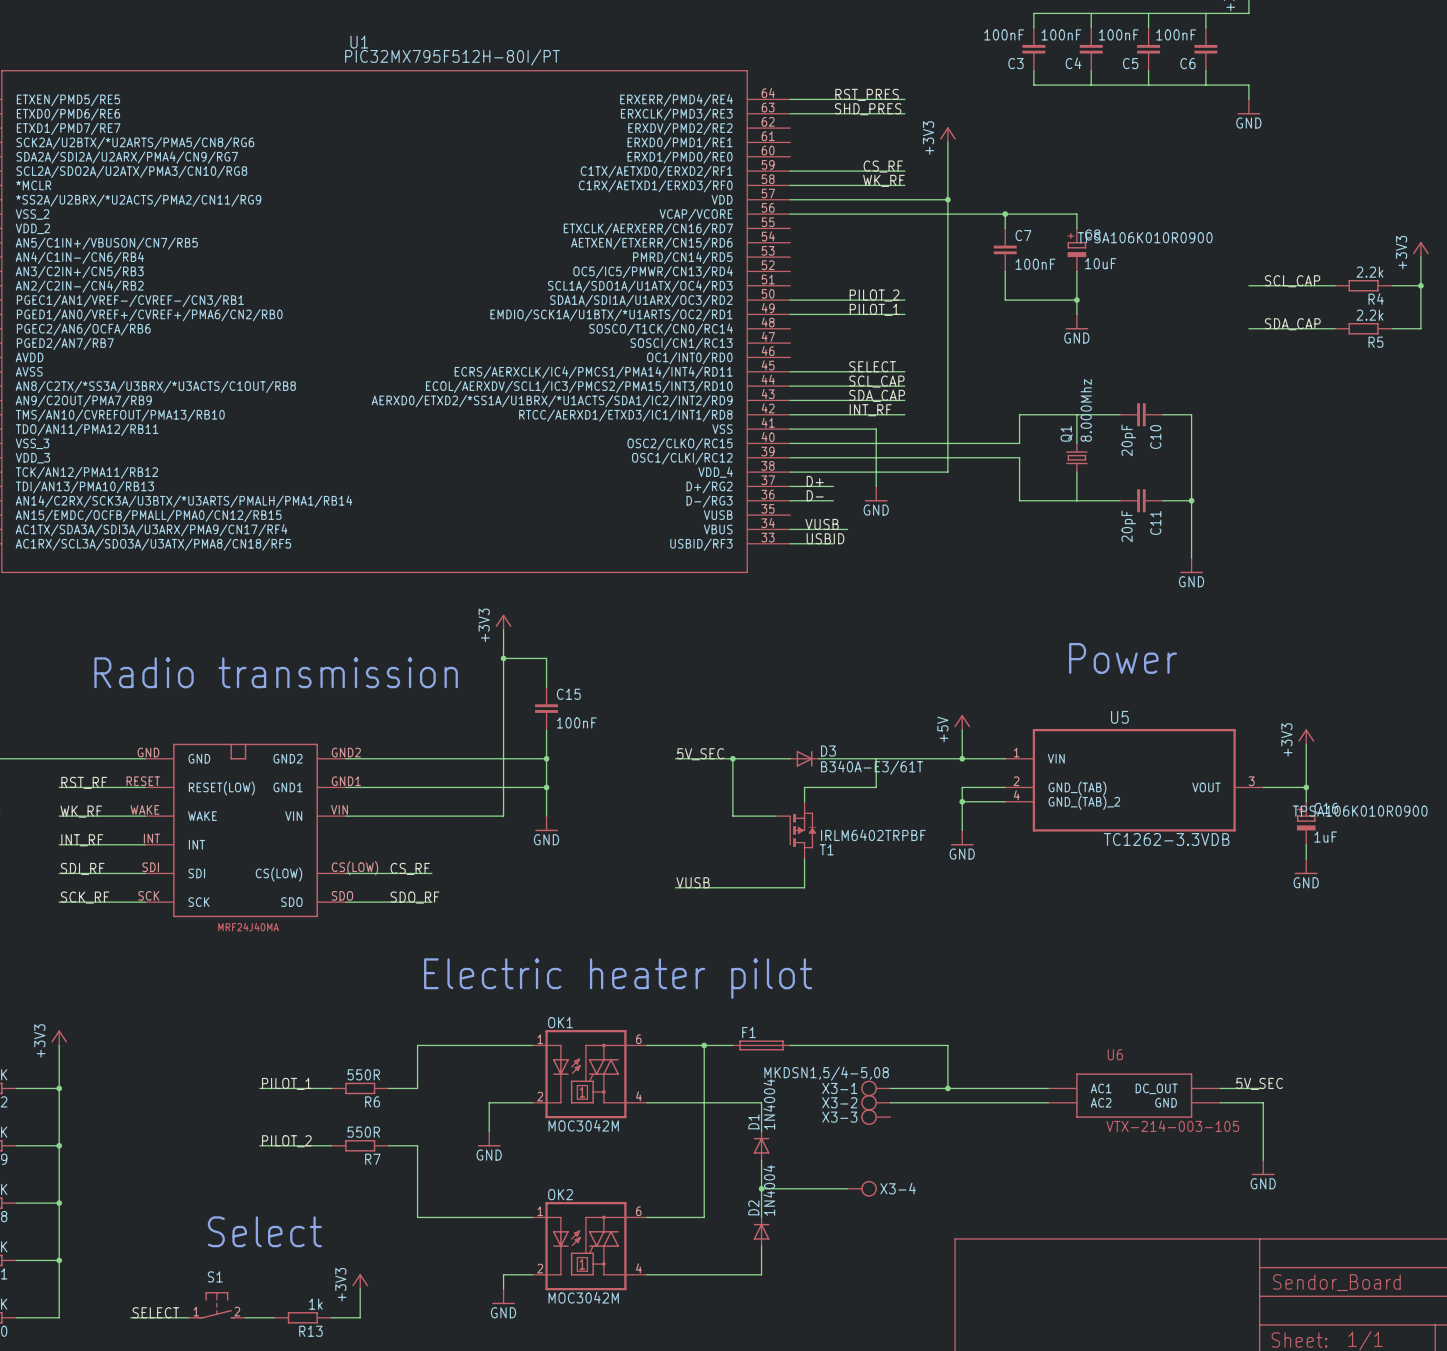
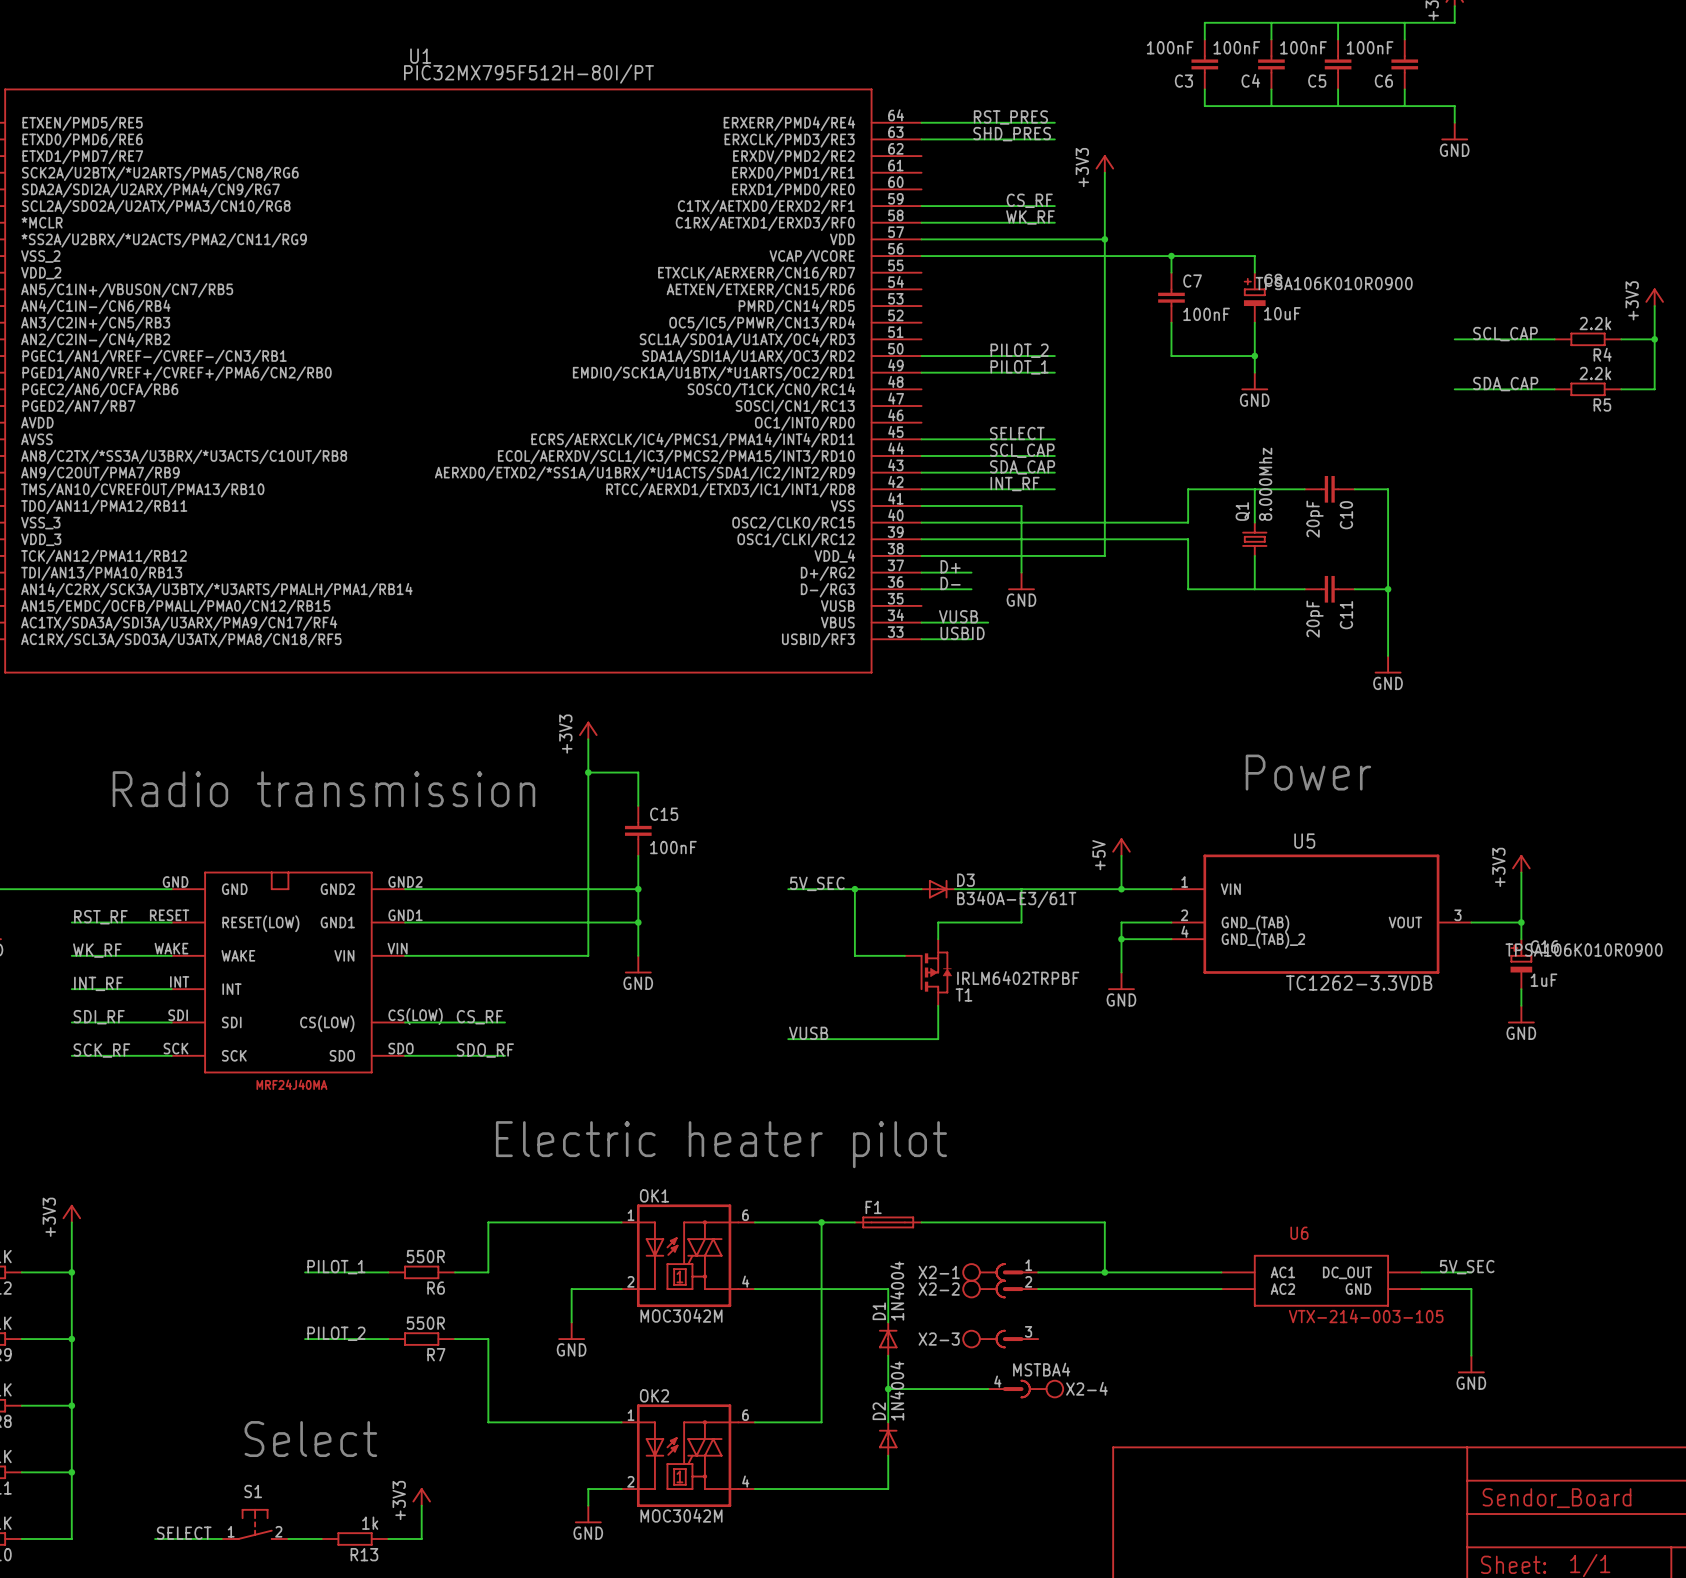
X2-1: none -> (1000, 1272)
X3-1: MKDSN1,5/4-5,08 (875, 1088) -> none
X2-2: none -> (1000, 1289)
X3-2: (875, 1102) -> none
X3-3: (875, 1117) -> none
X2-3: none -> (1000, 1339)
X3-4: (862, 1188) -> none
X2-4: none -> MSTBA4 (1026, 1389)

